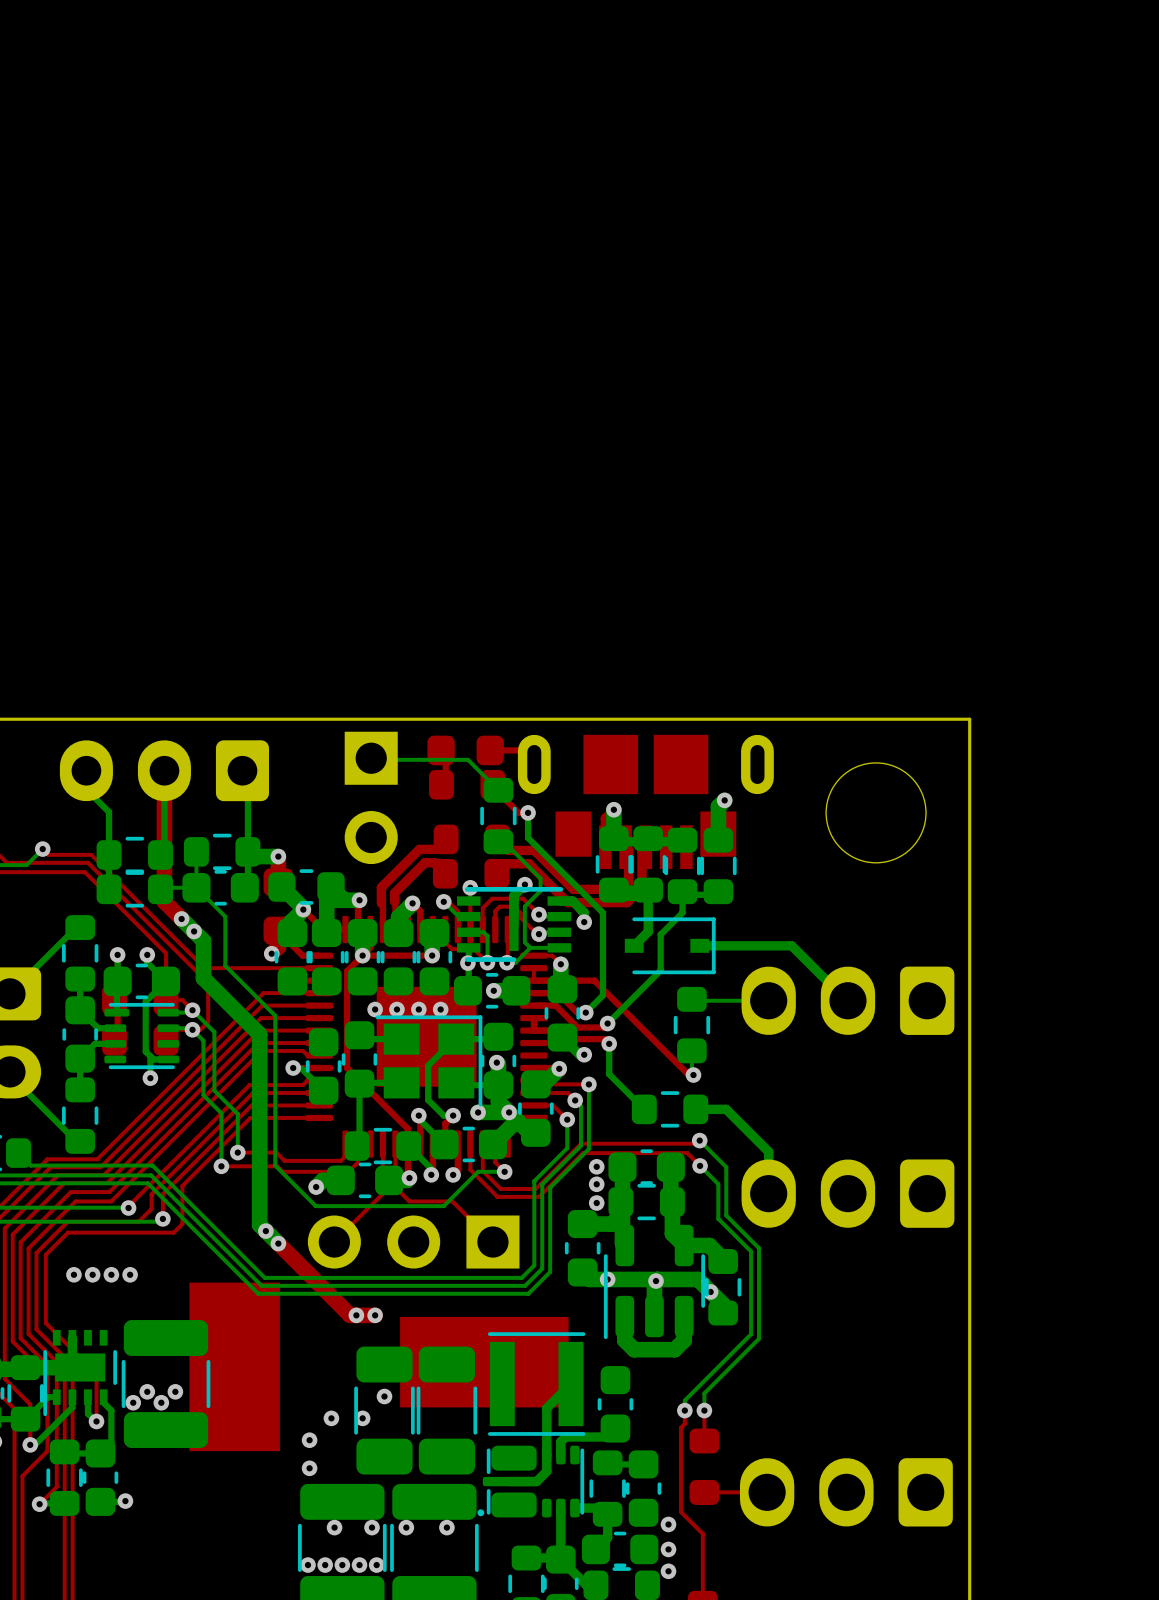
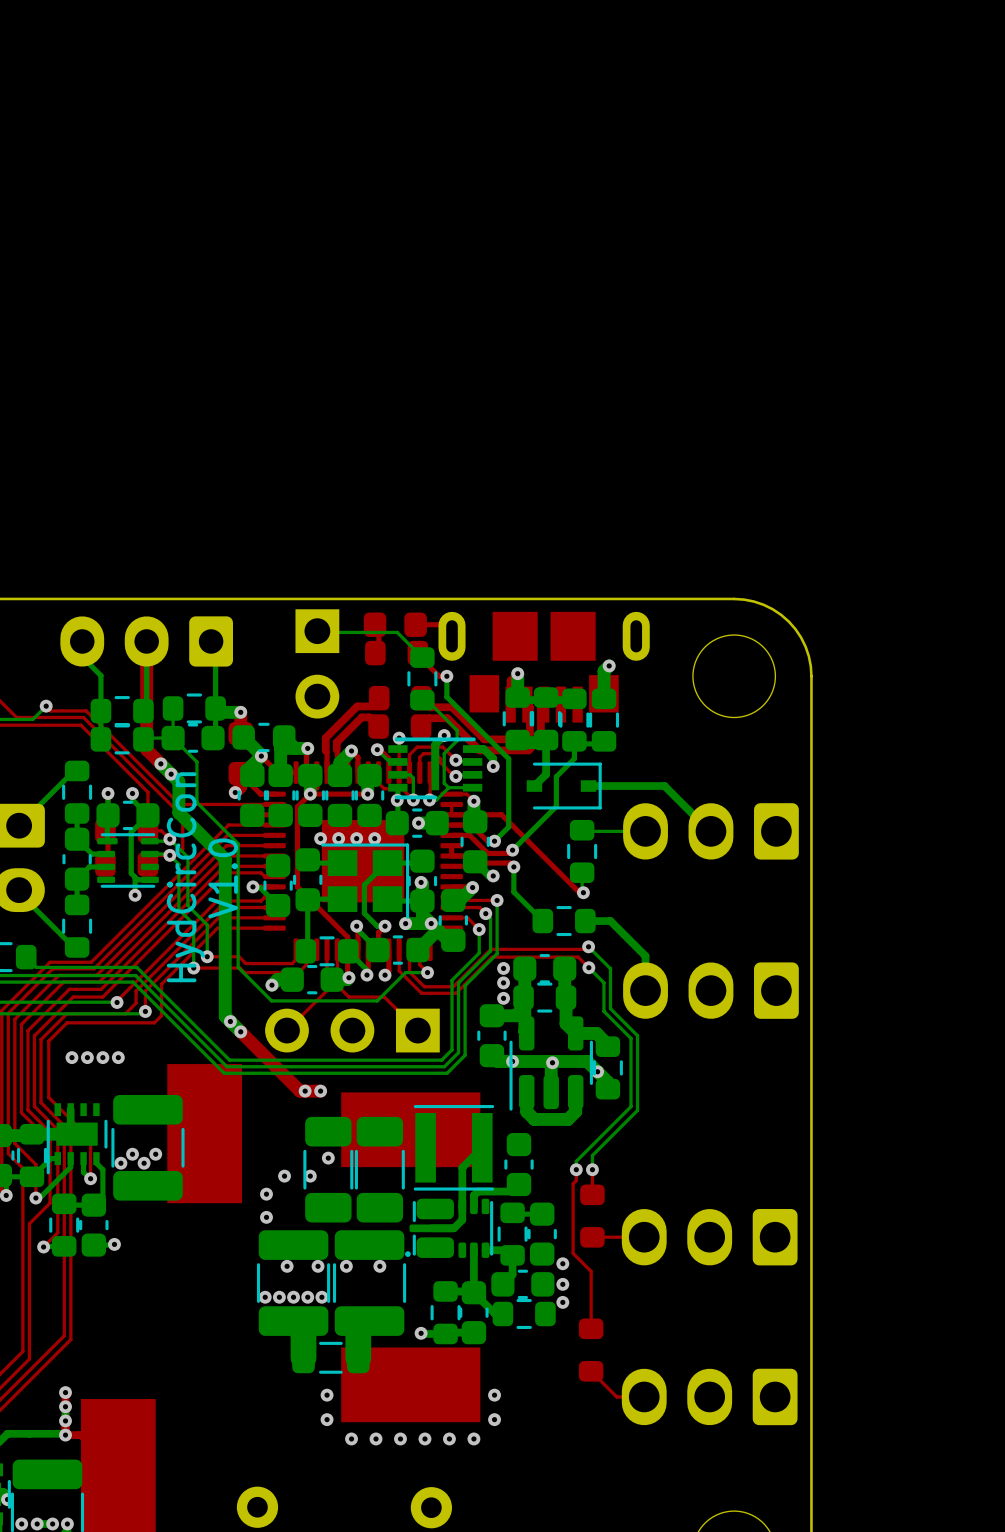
board edge: (876, 719) (969, 719) (969, 812) -> (734, 598) (763, 604) (788, 621) (805, 646) (811, 676)
text: none -> HydCircCon (185, 877)
text: none -> V1.0 (223, 878)

